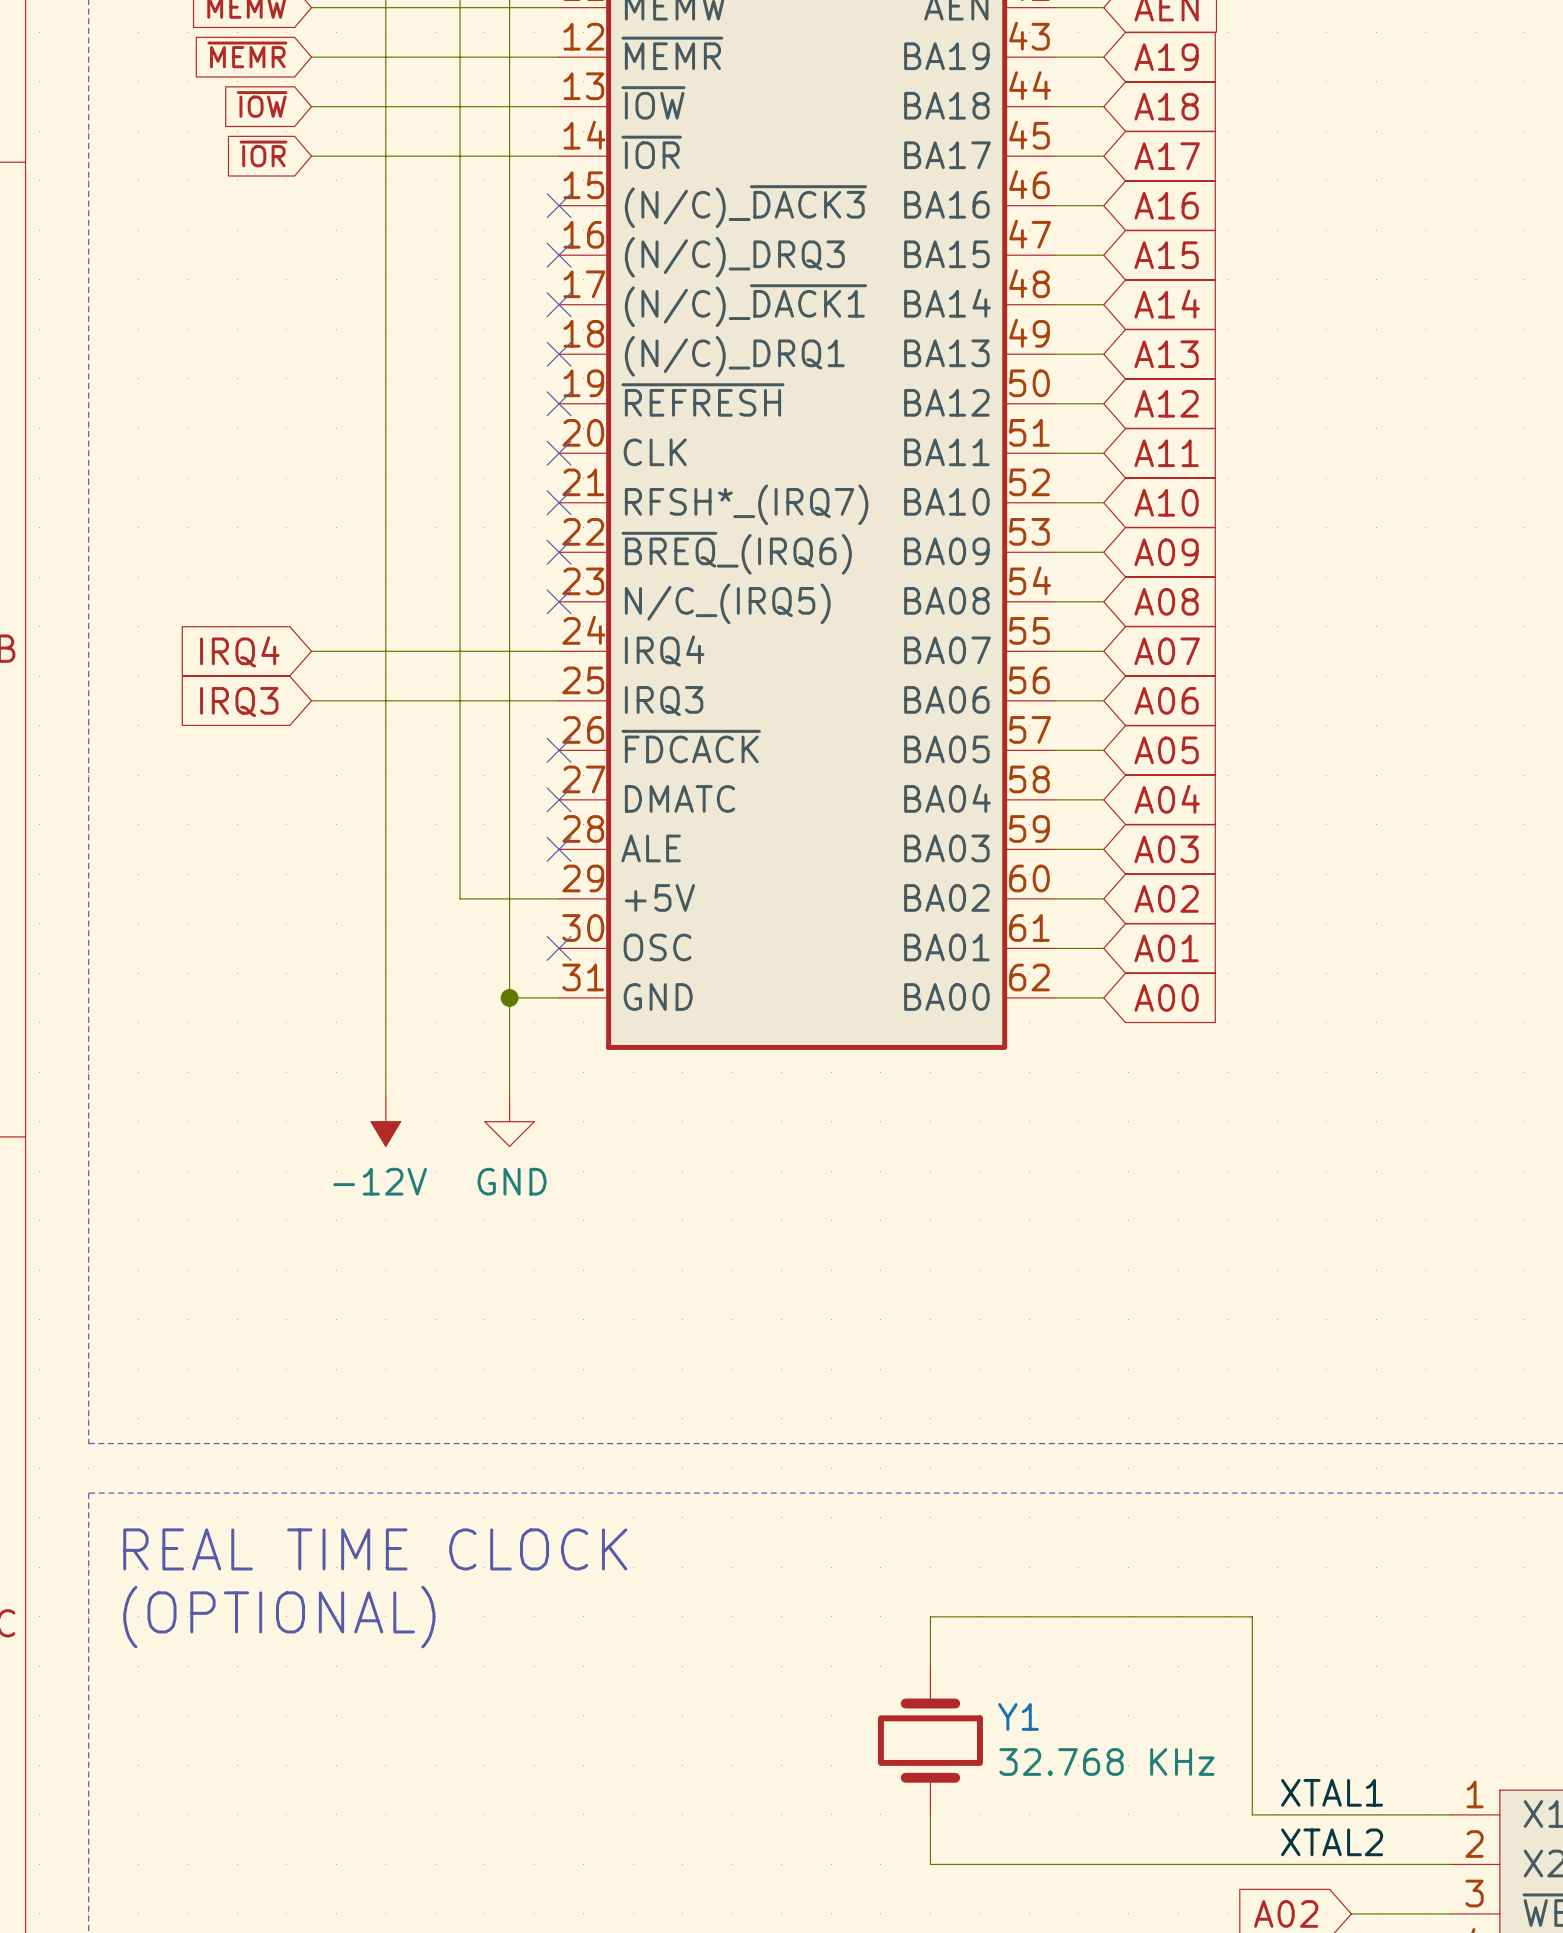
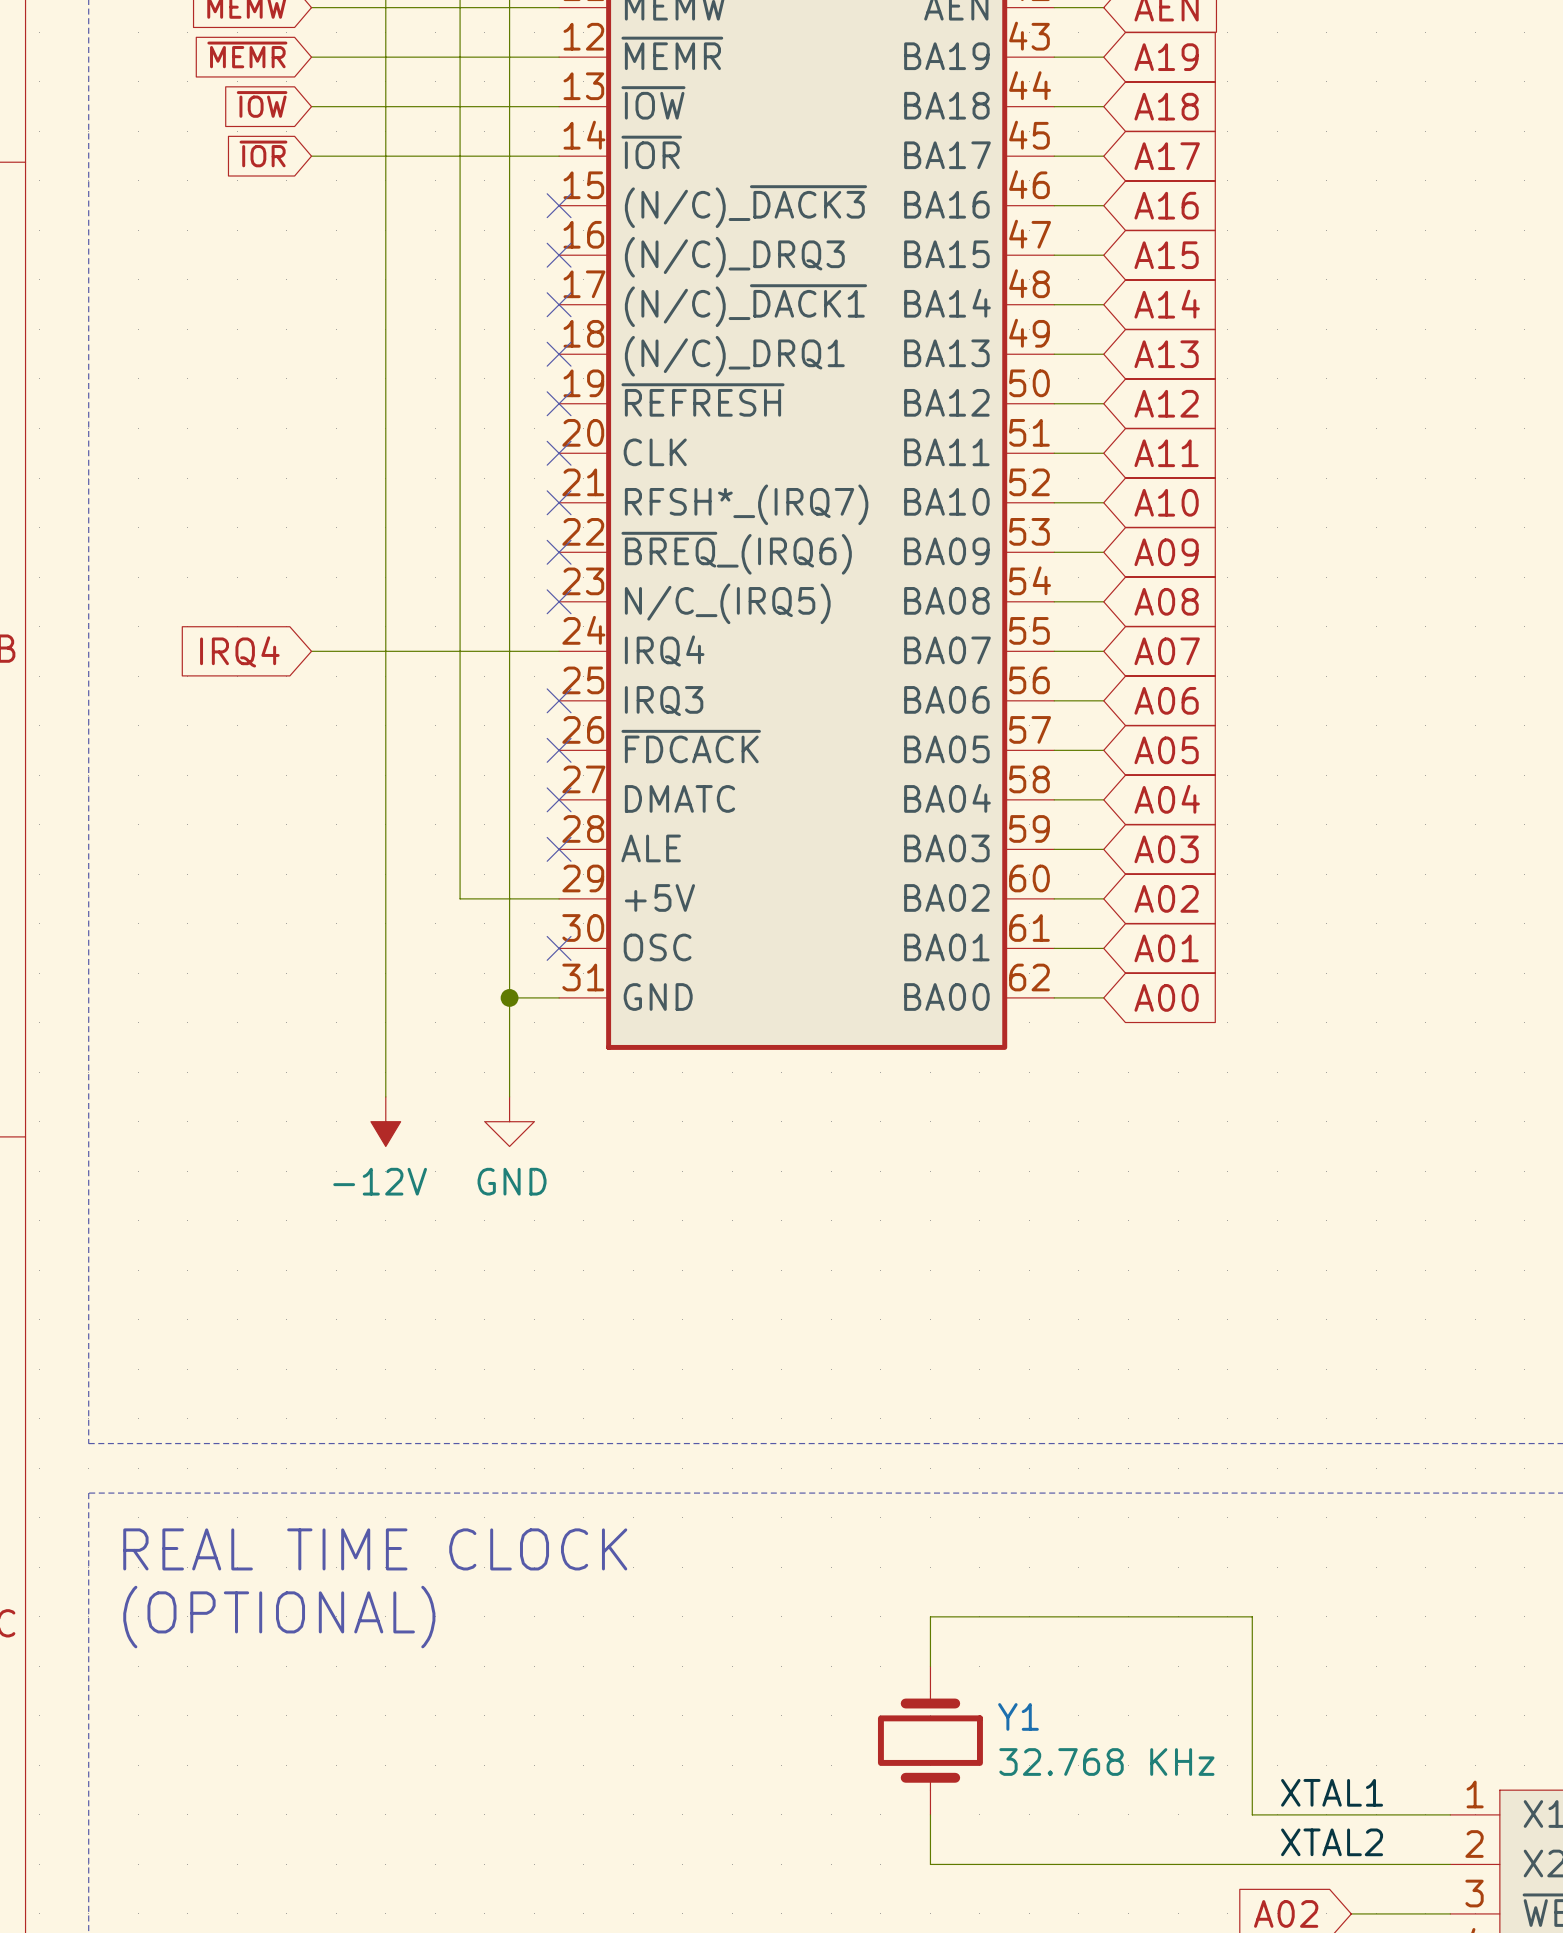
wire: (311, 700) (559, 700) -> none
no-connect mark: none -> (559, 700)
global label: IRQ3 (239, 702) -> none

